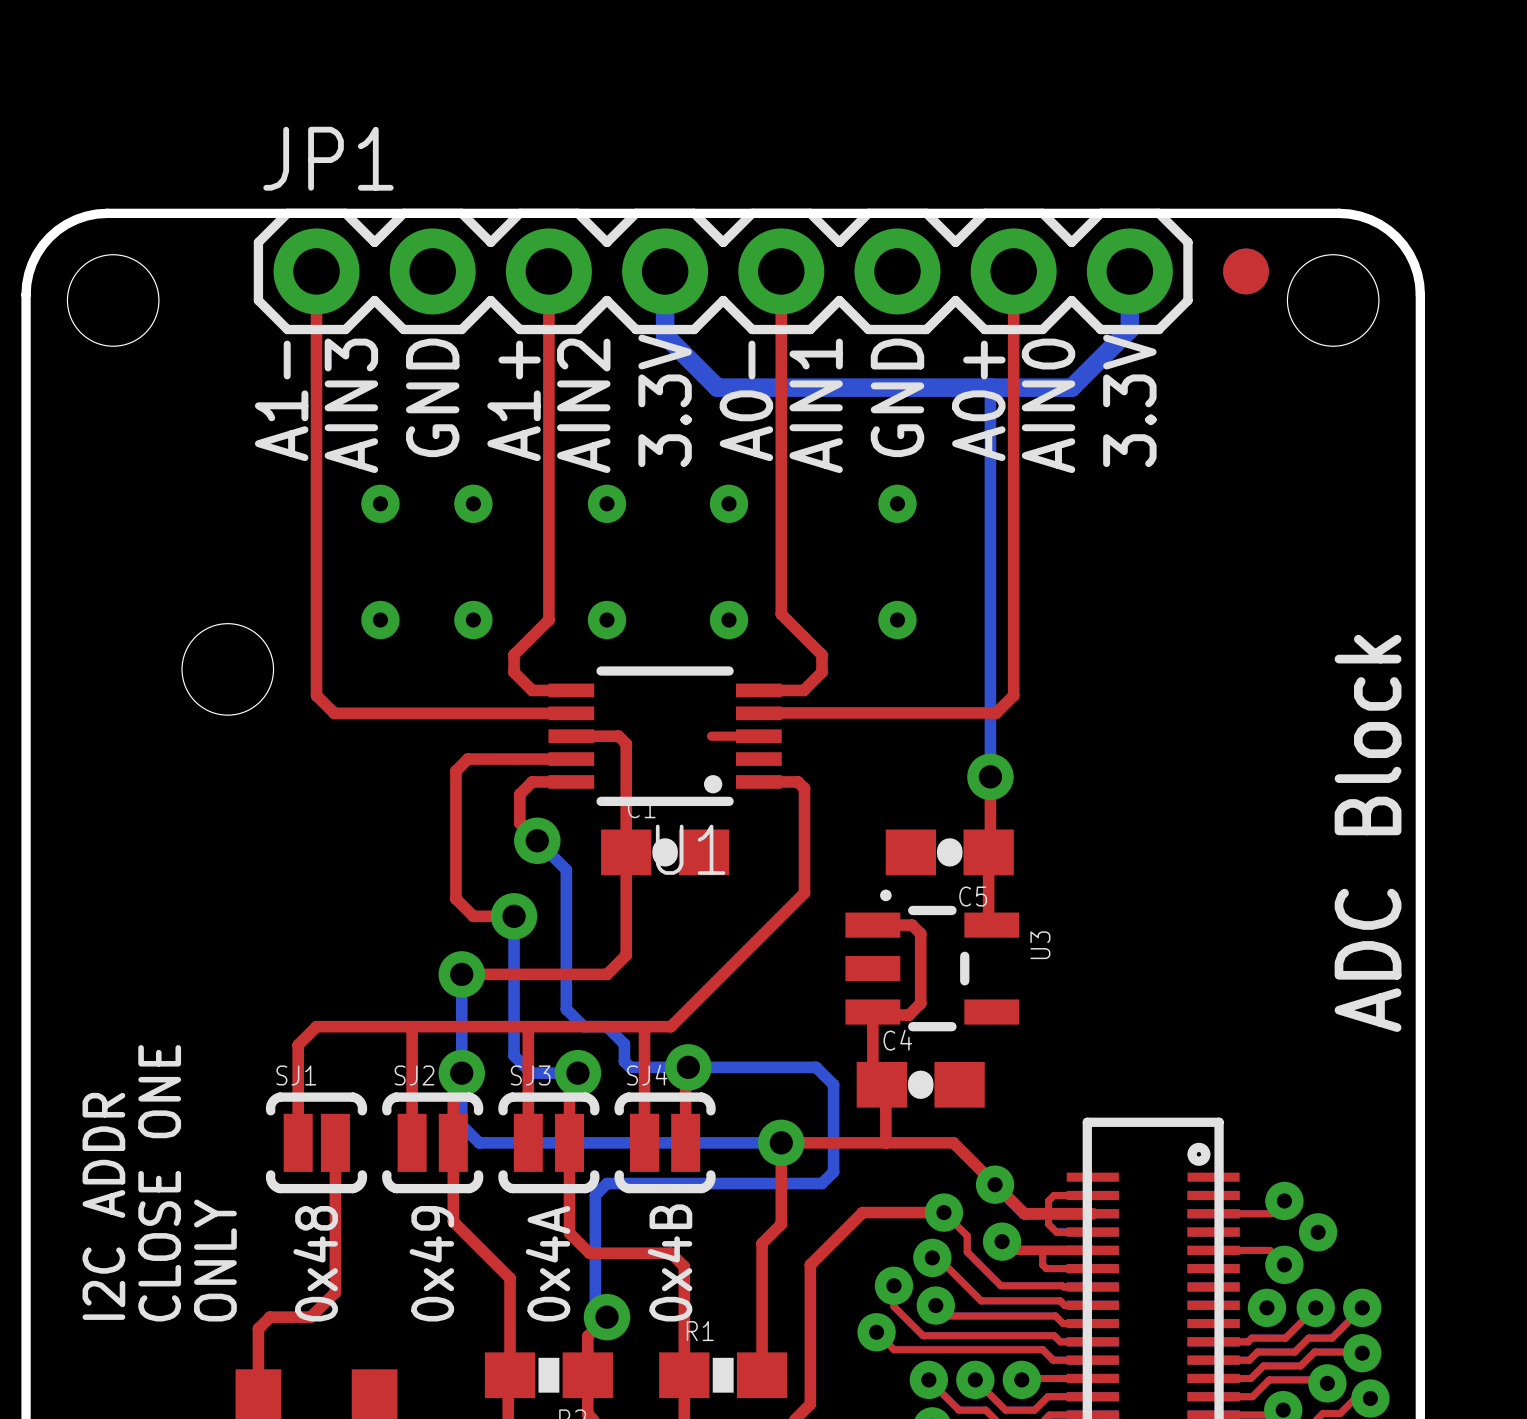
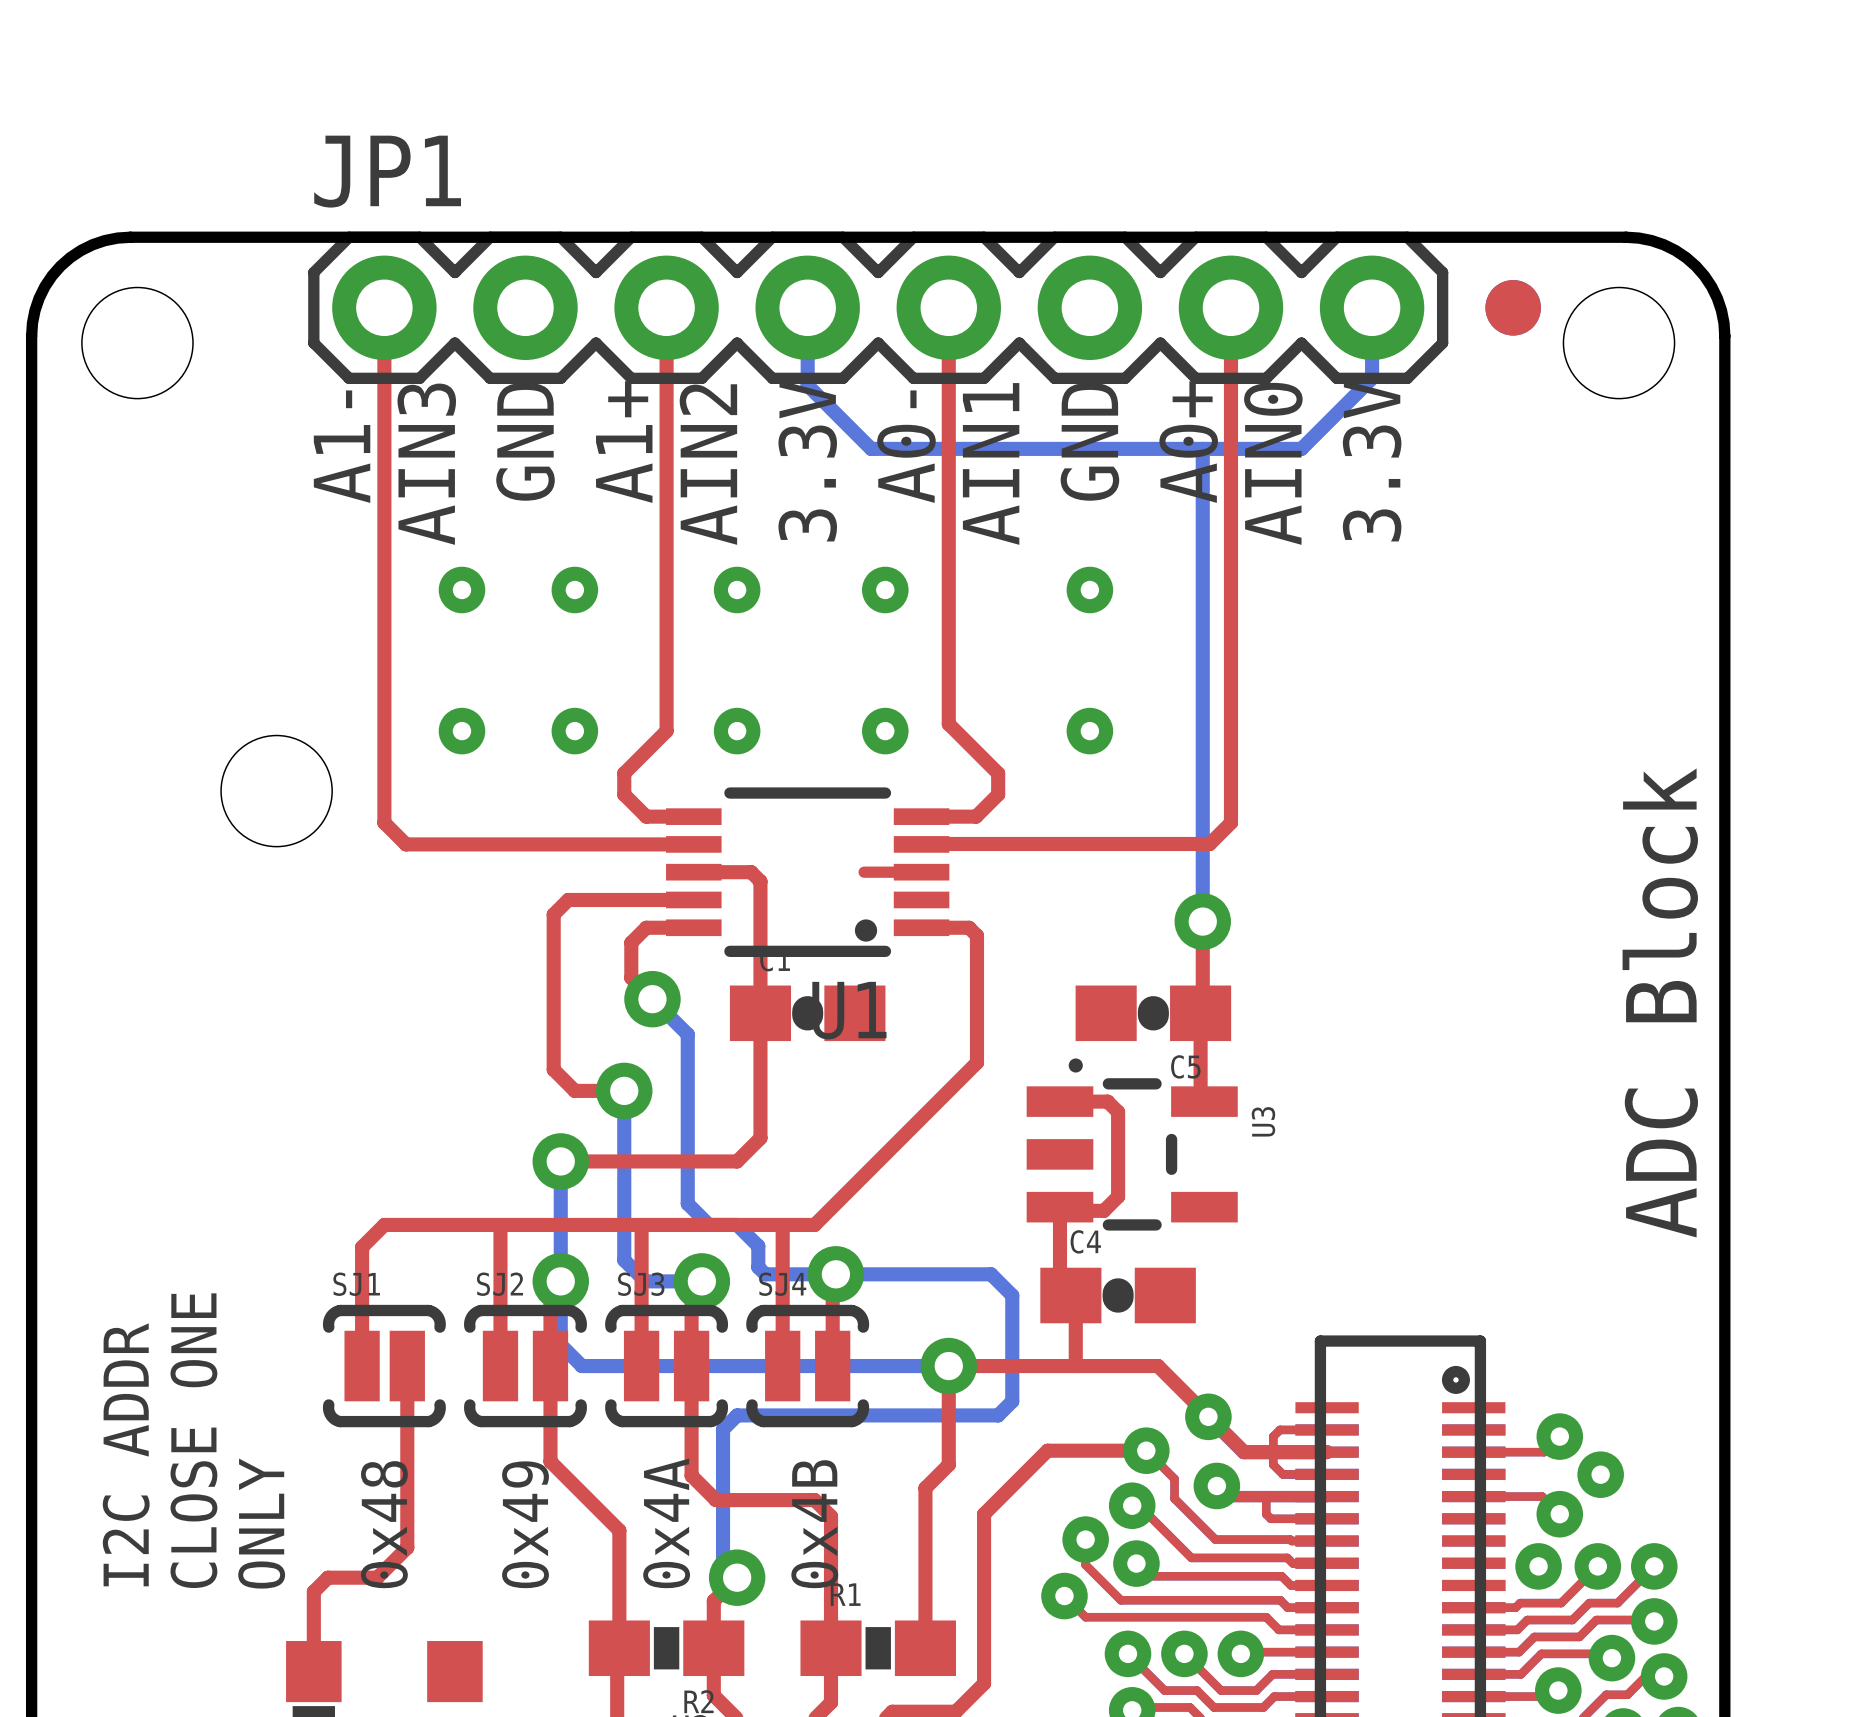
bottom track width: thick (665, 271) (665, 335) (717, 387) (1071, 387) (1129, 329) (1129, 271) -> thin (807, 307) (807, 385) (871, 448) (1301, 448) (1372, 378) (1372, 307)

